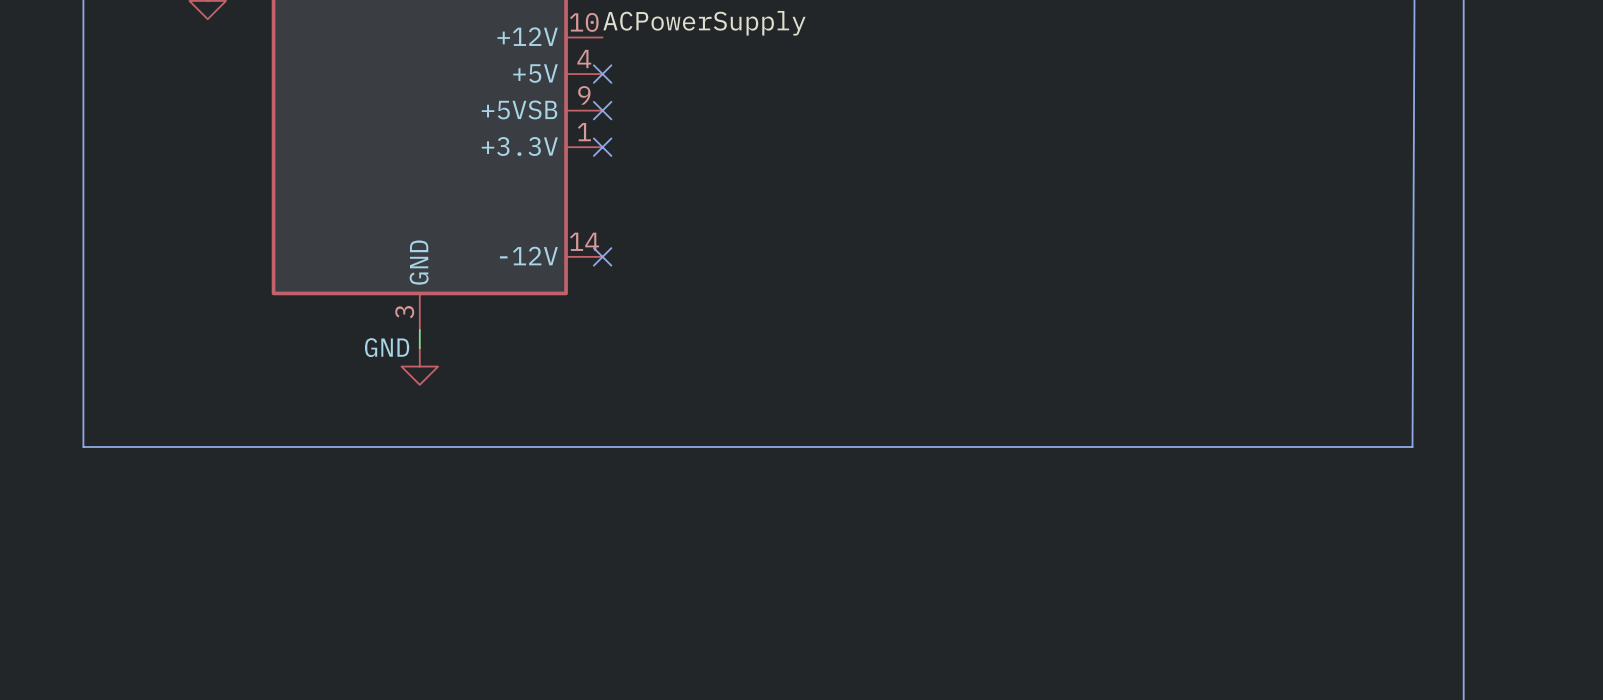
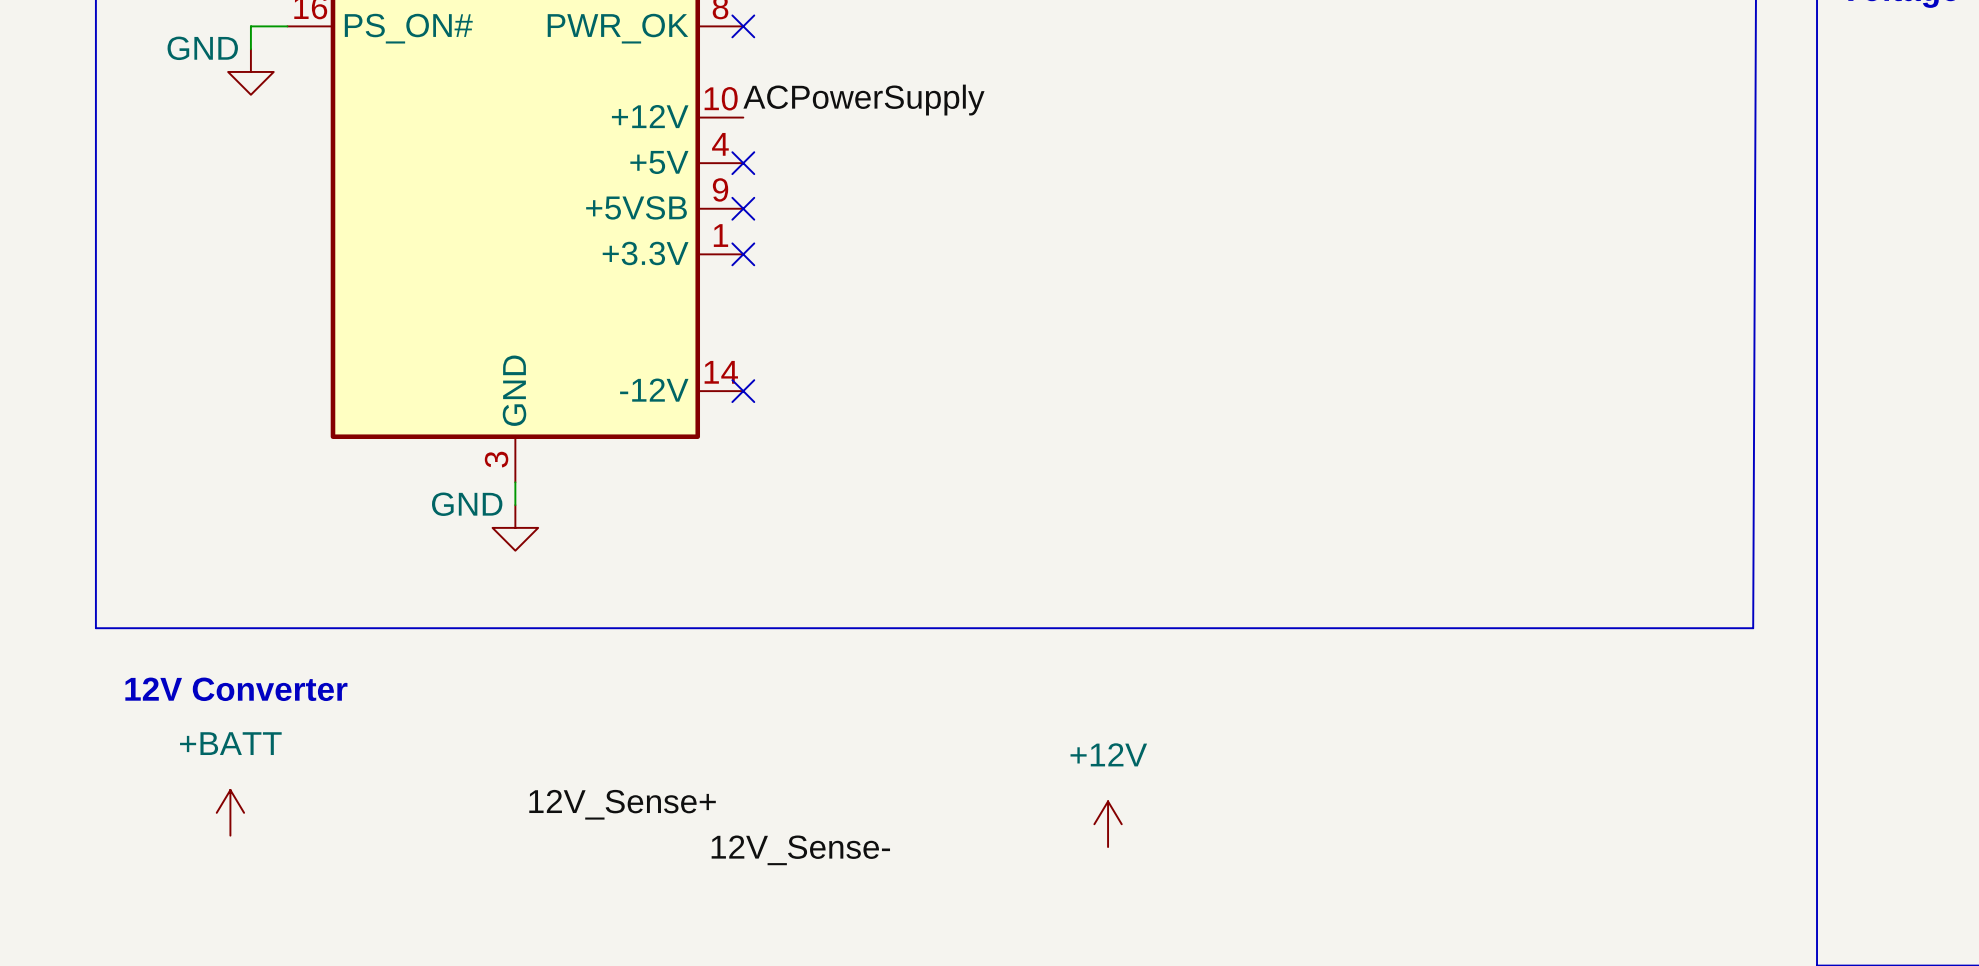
text: none -> 12V Converter (236, 689)
label: none -> 12V_Sense+ (622, 804)
power symbol: none -> +BATT (230, 812)
power symbol: none -> +12V (1108, 824)
label: none -> 12V_Sense- (800, 850)

